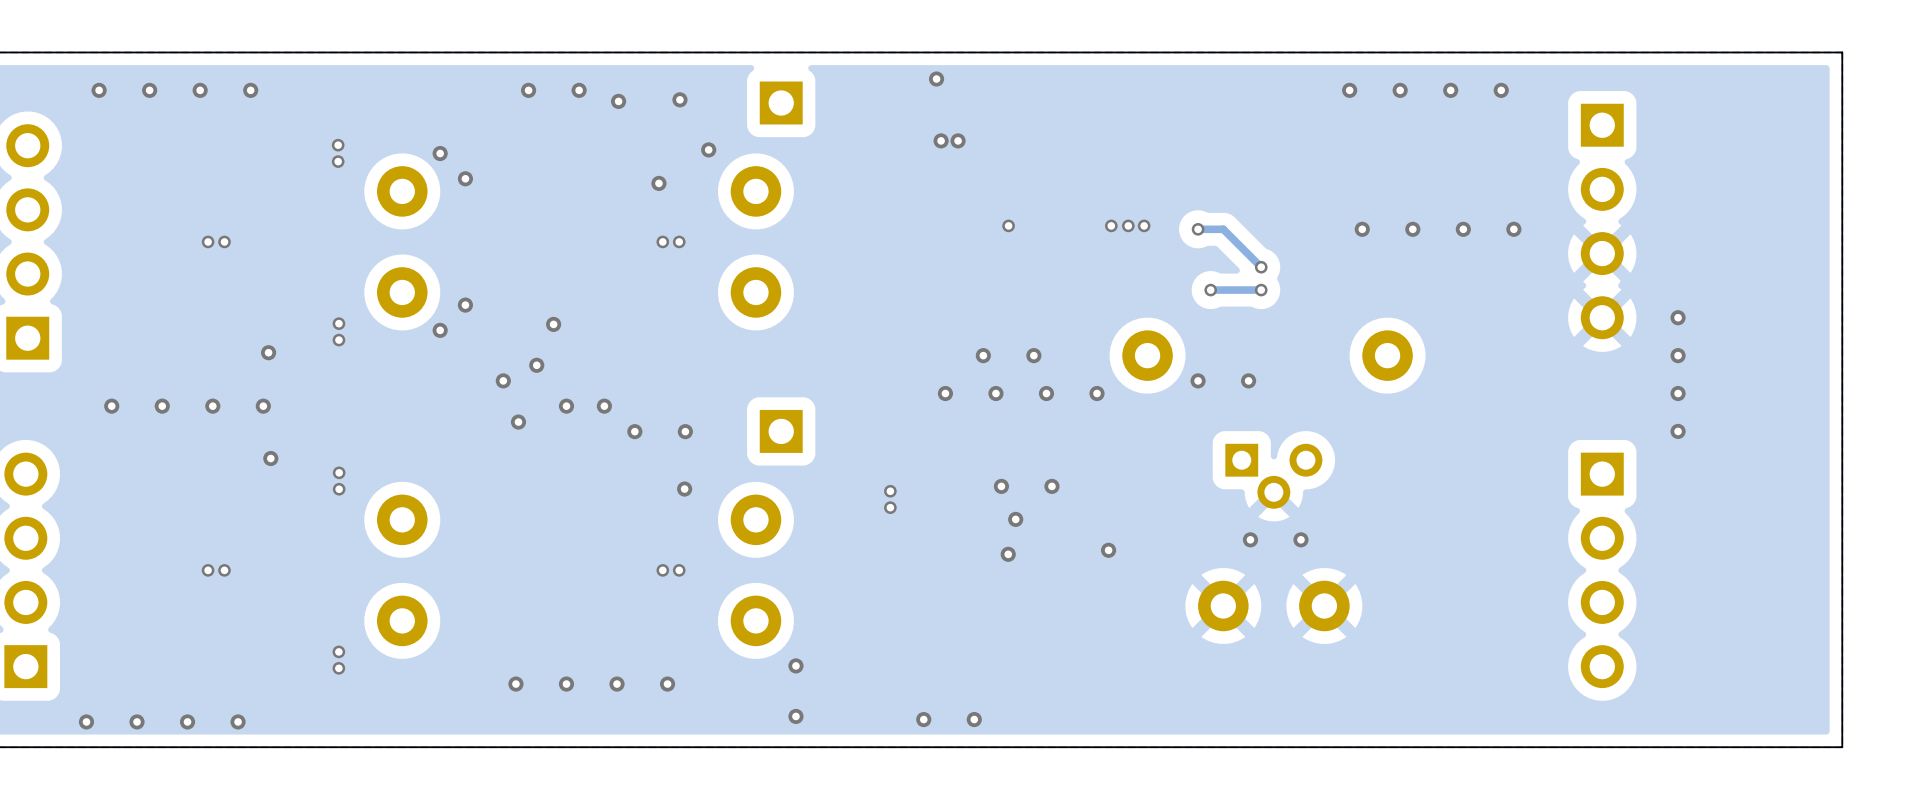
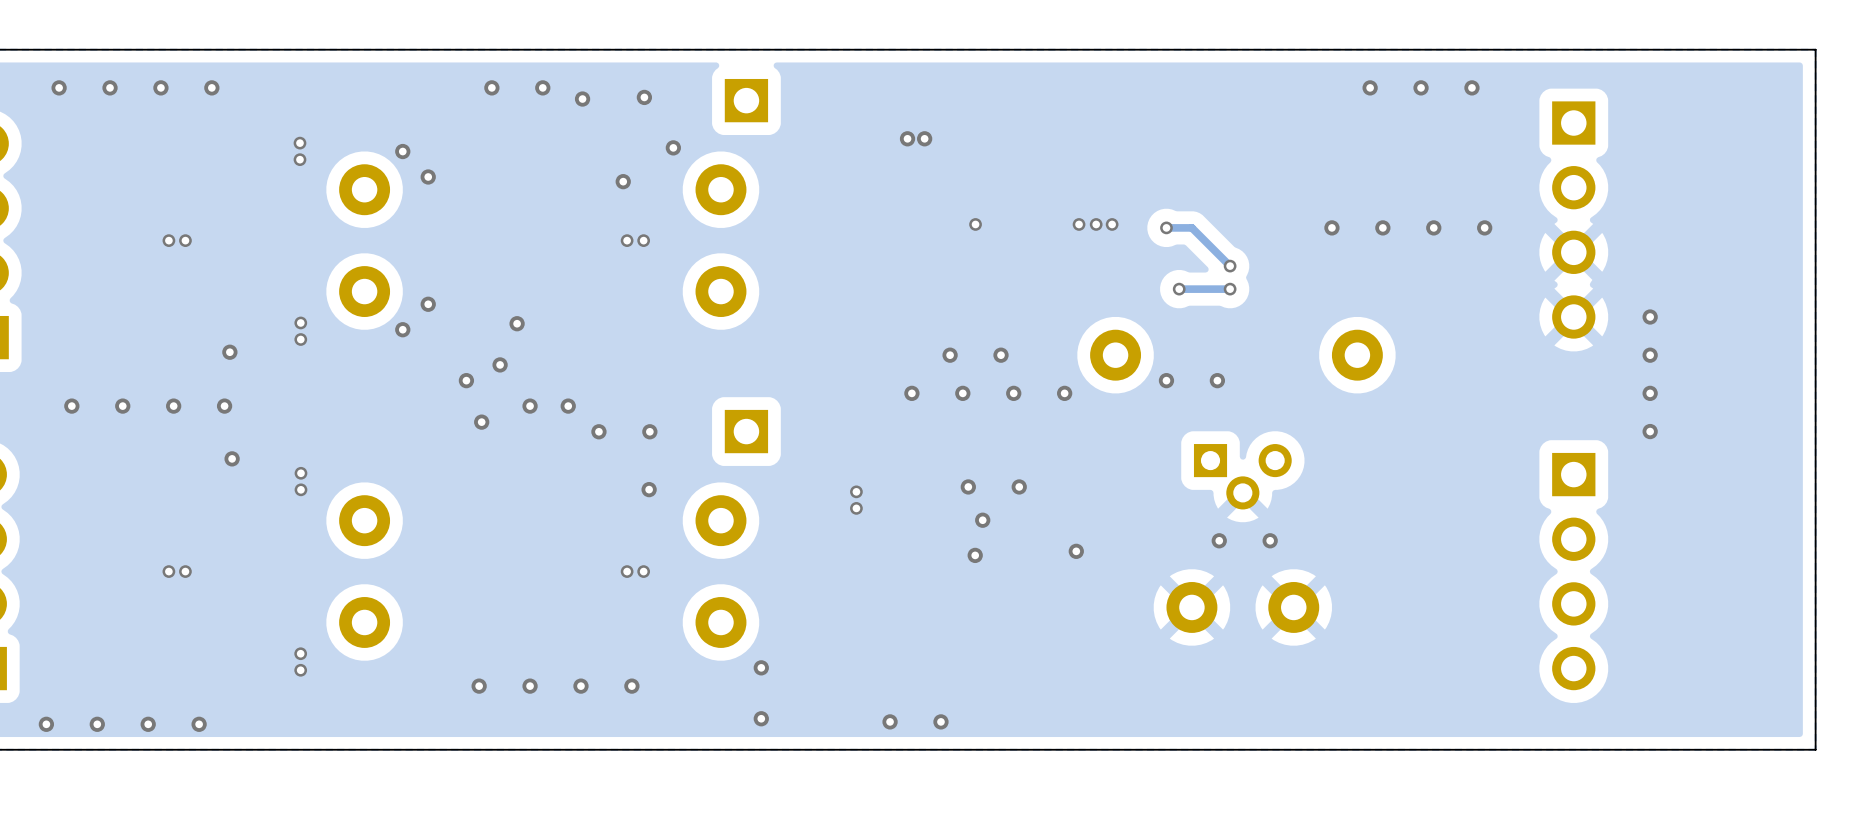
via: (936, 79) -> none
via: (1349, 90) -> none

